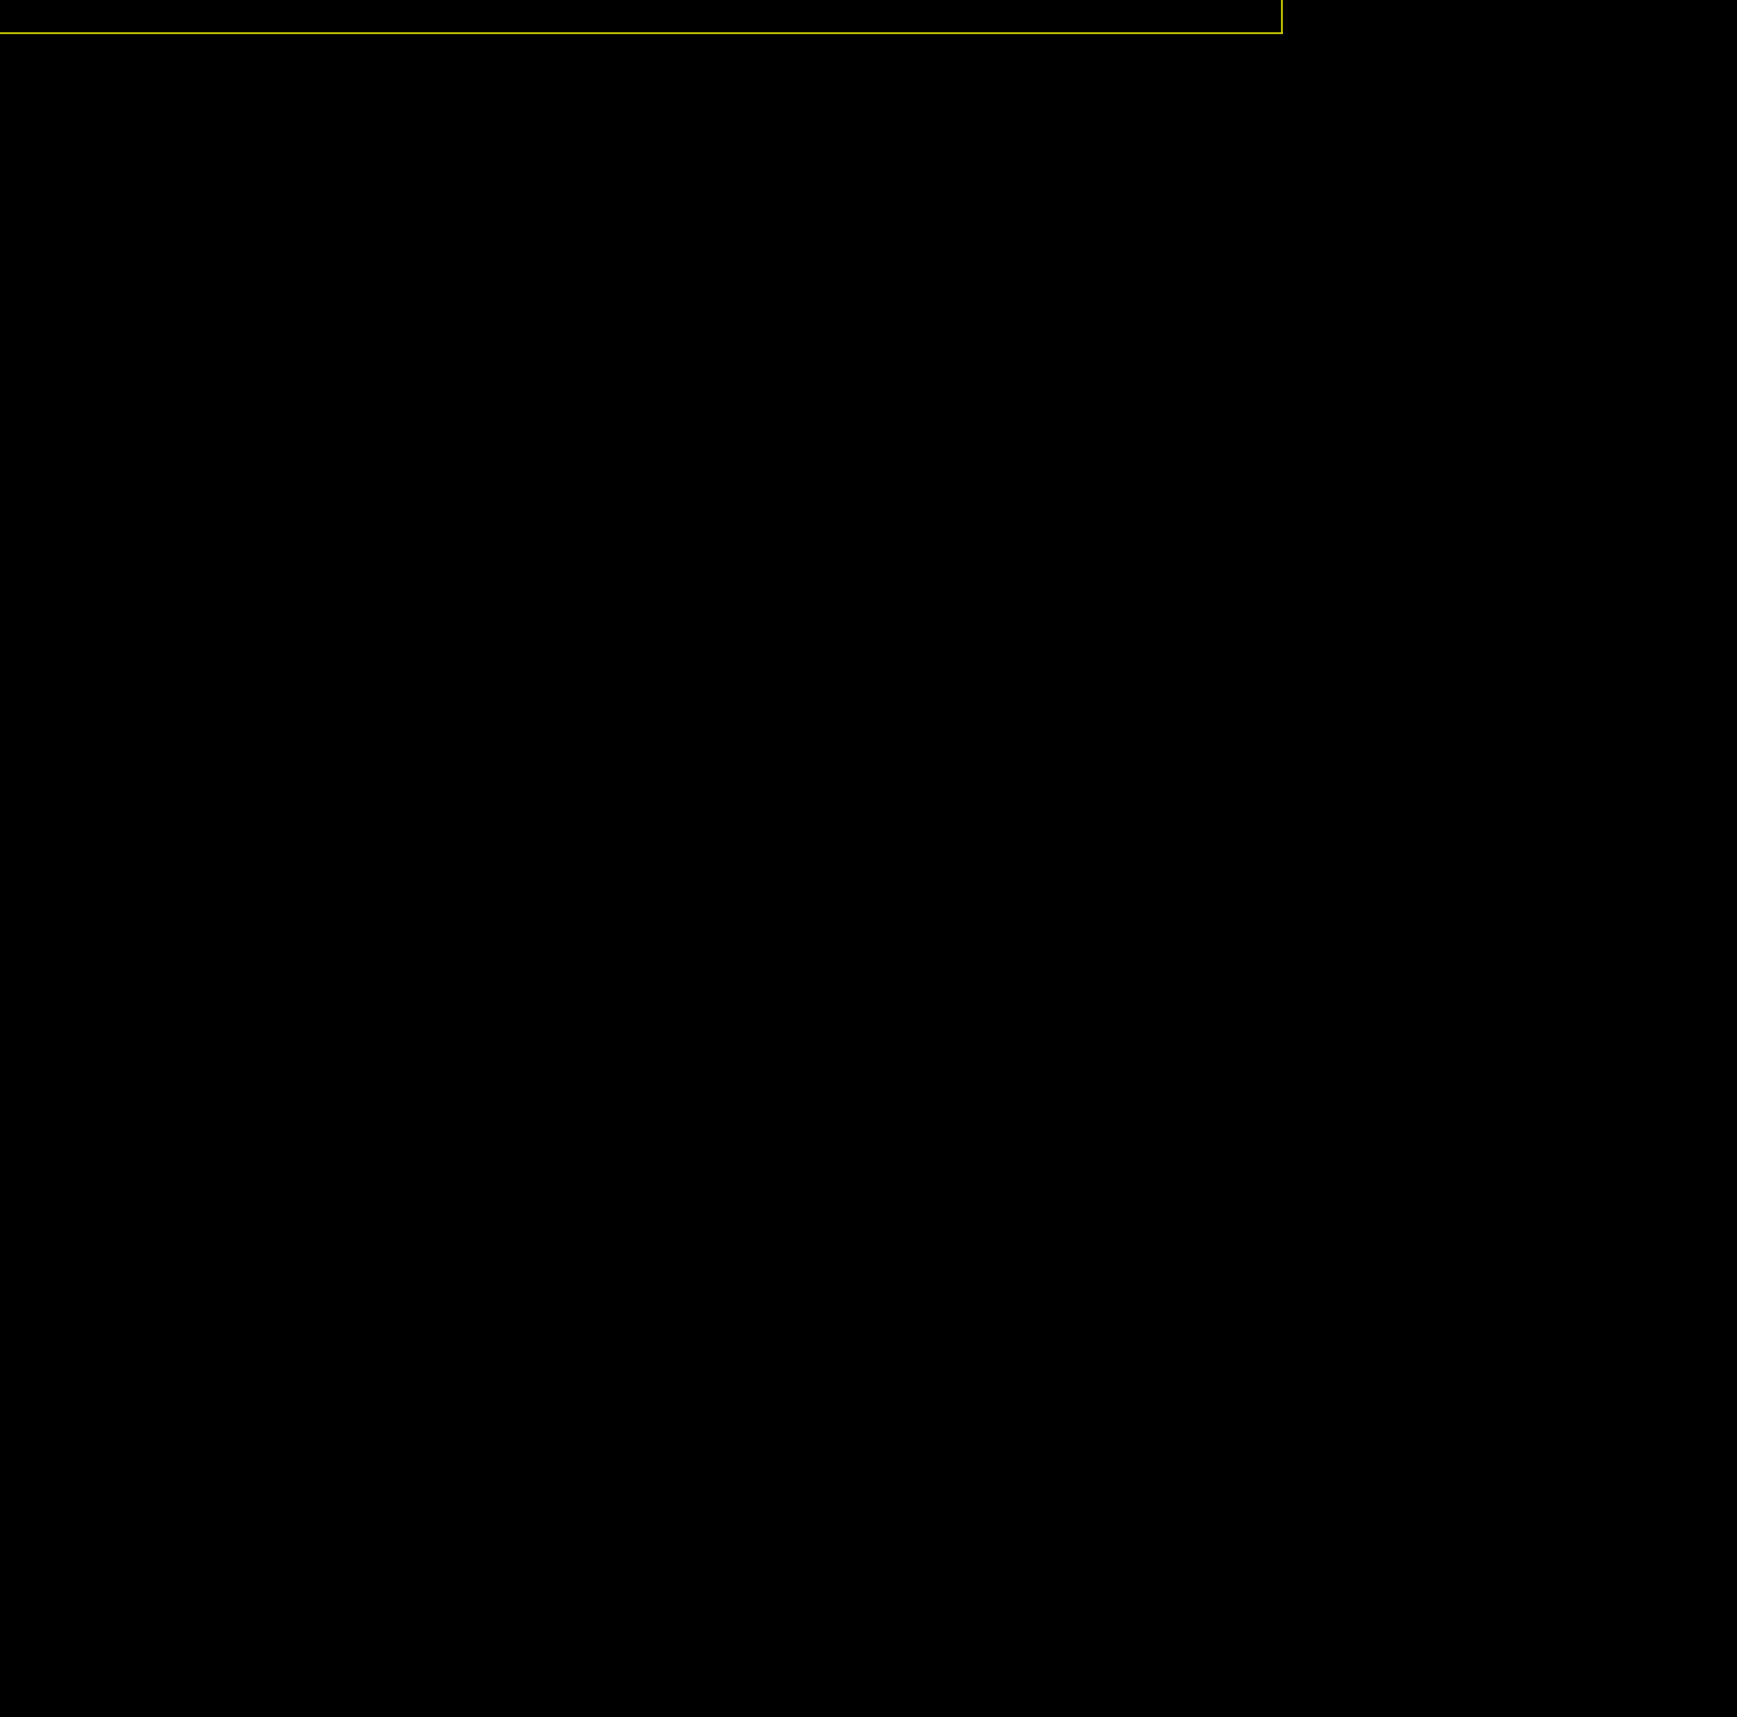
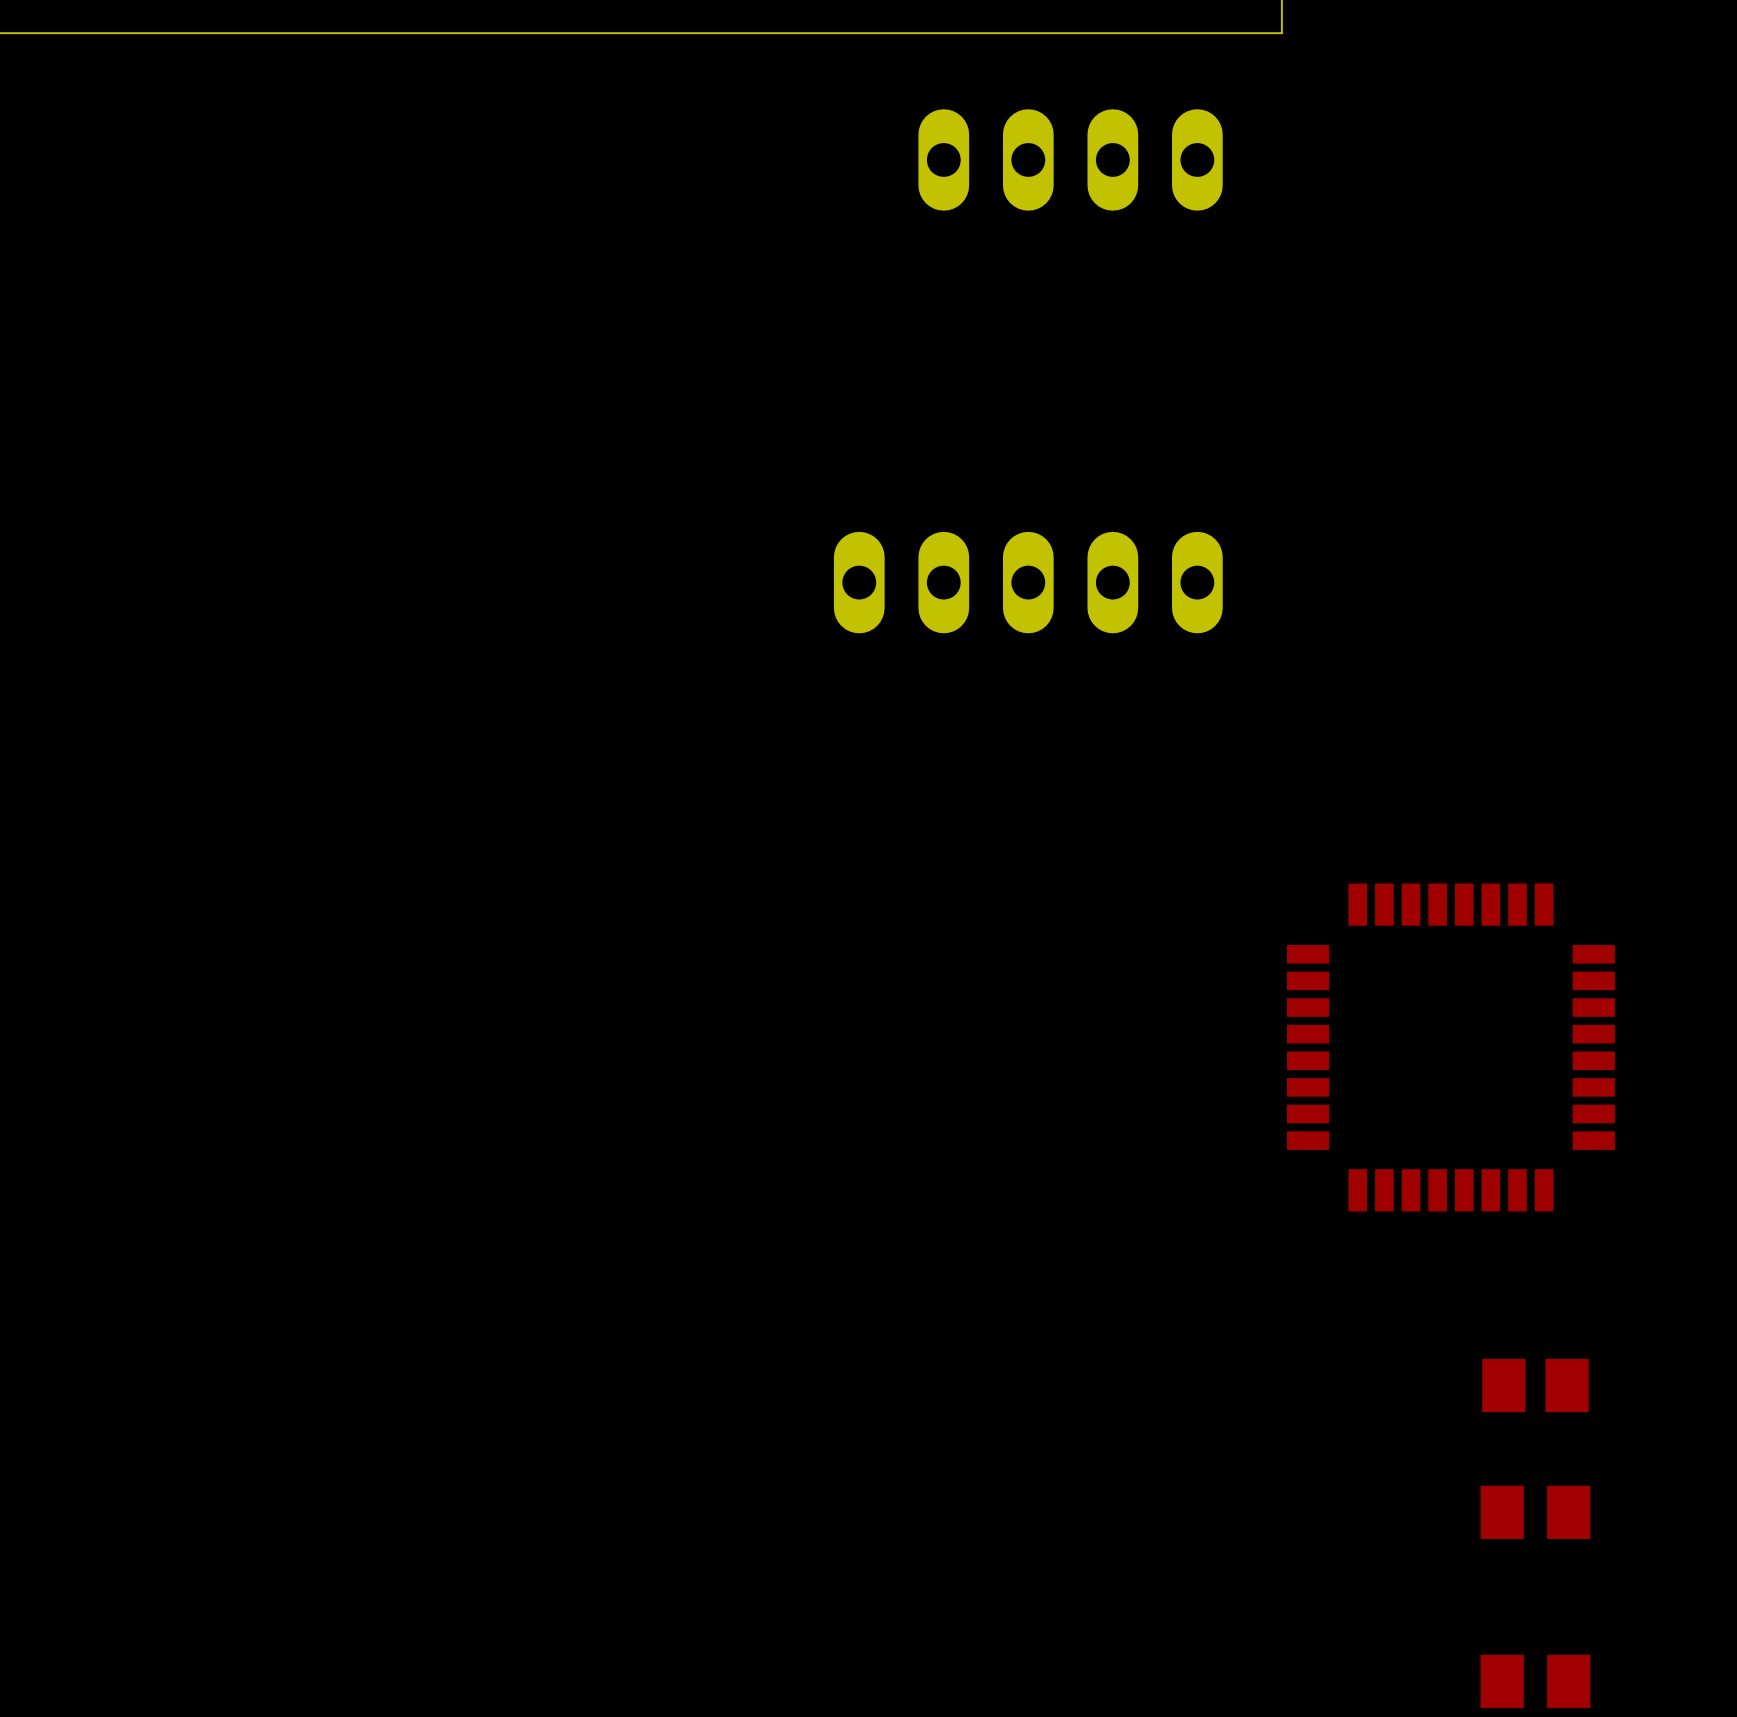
part: none -> (1070, 159)
part: none -> (1028, 582)
part: none -> (1450, 1047)
part: none -> (1535, 1385)
part: none -> (1535, 1512)
part: none -> (1535, 1681)

